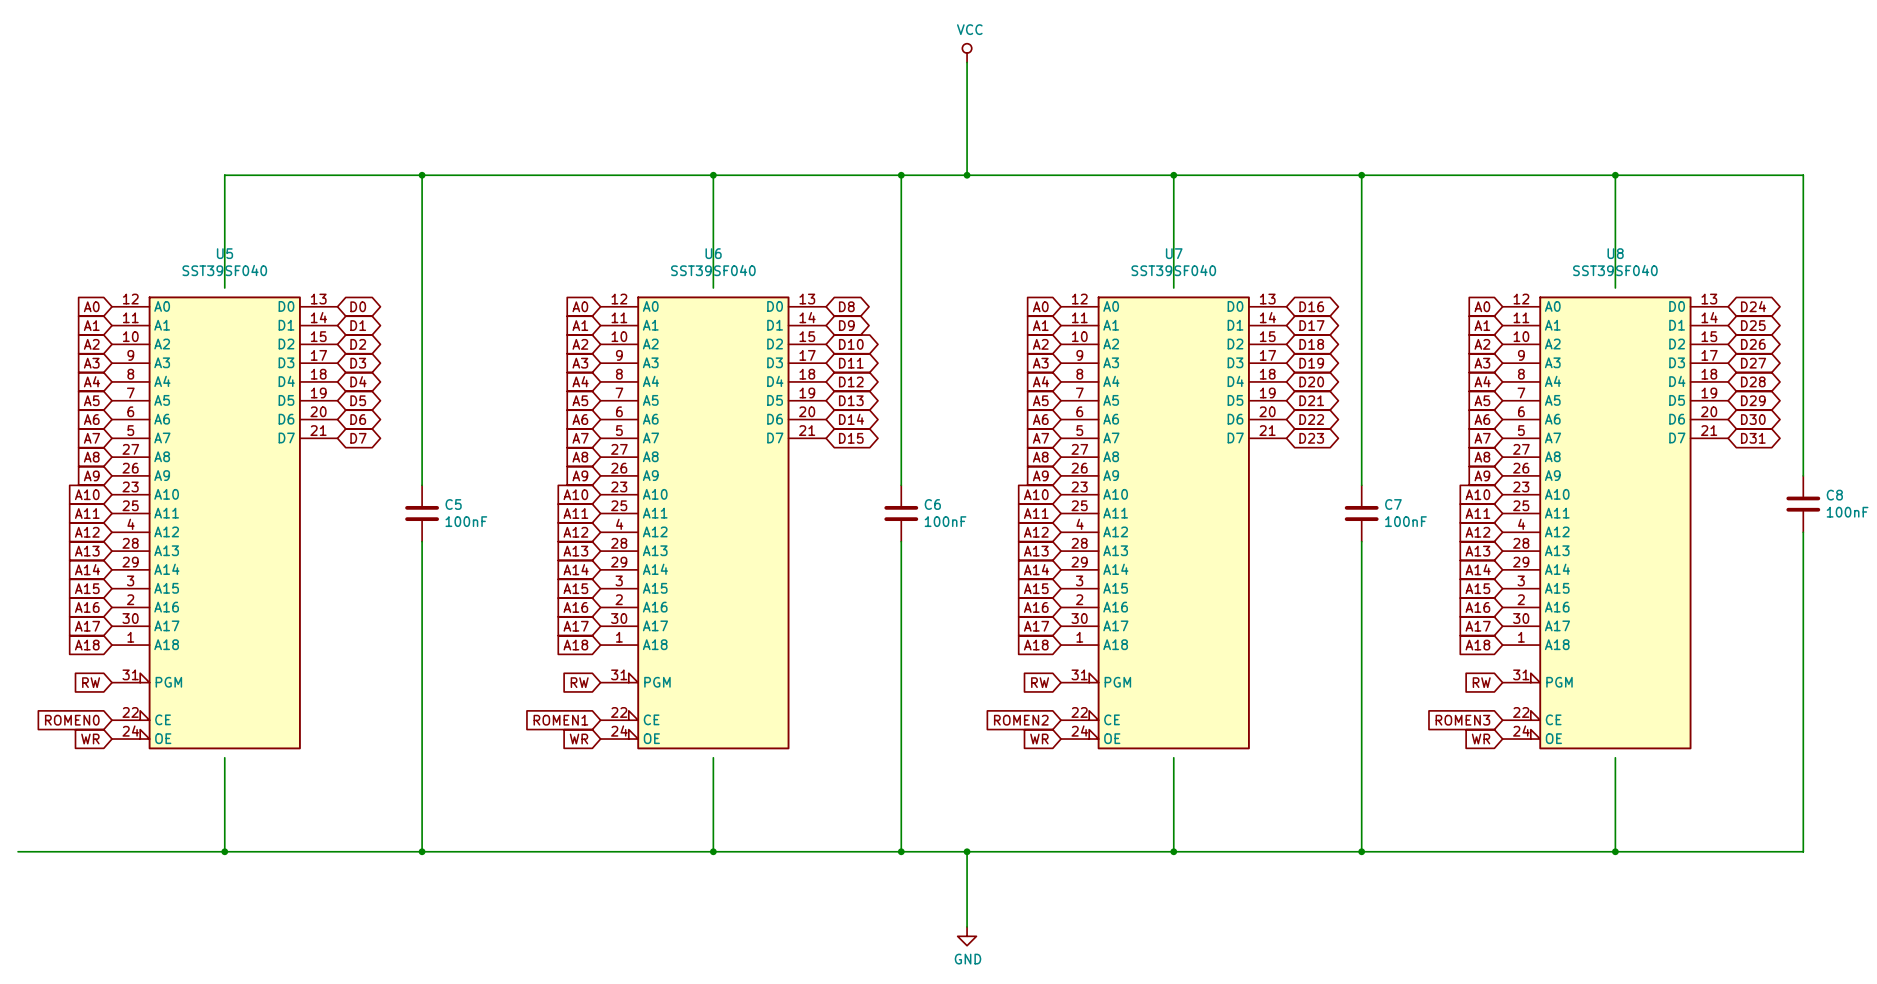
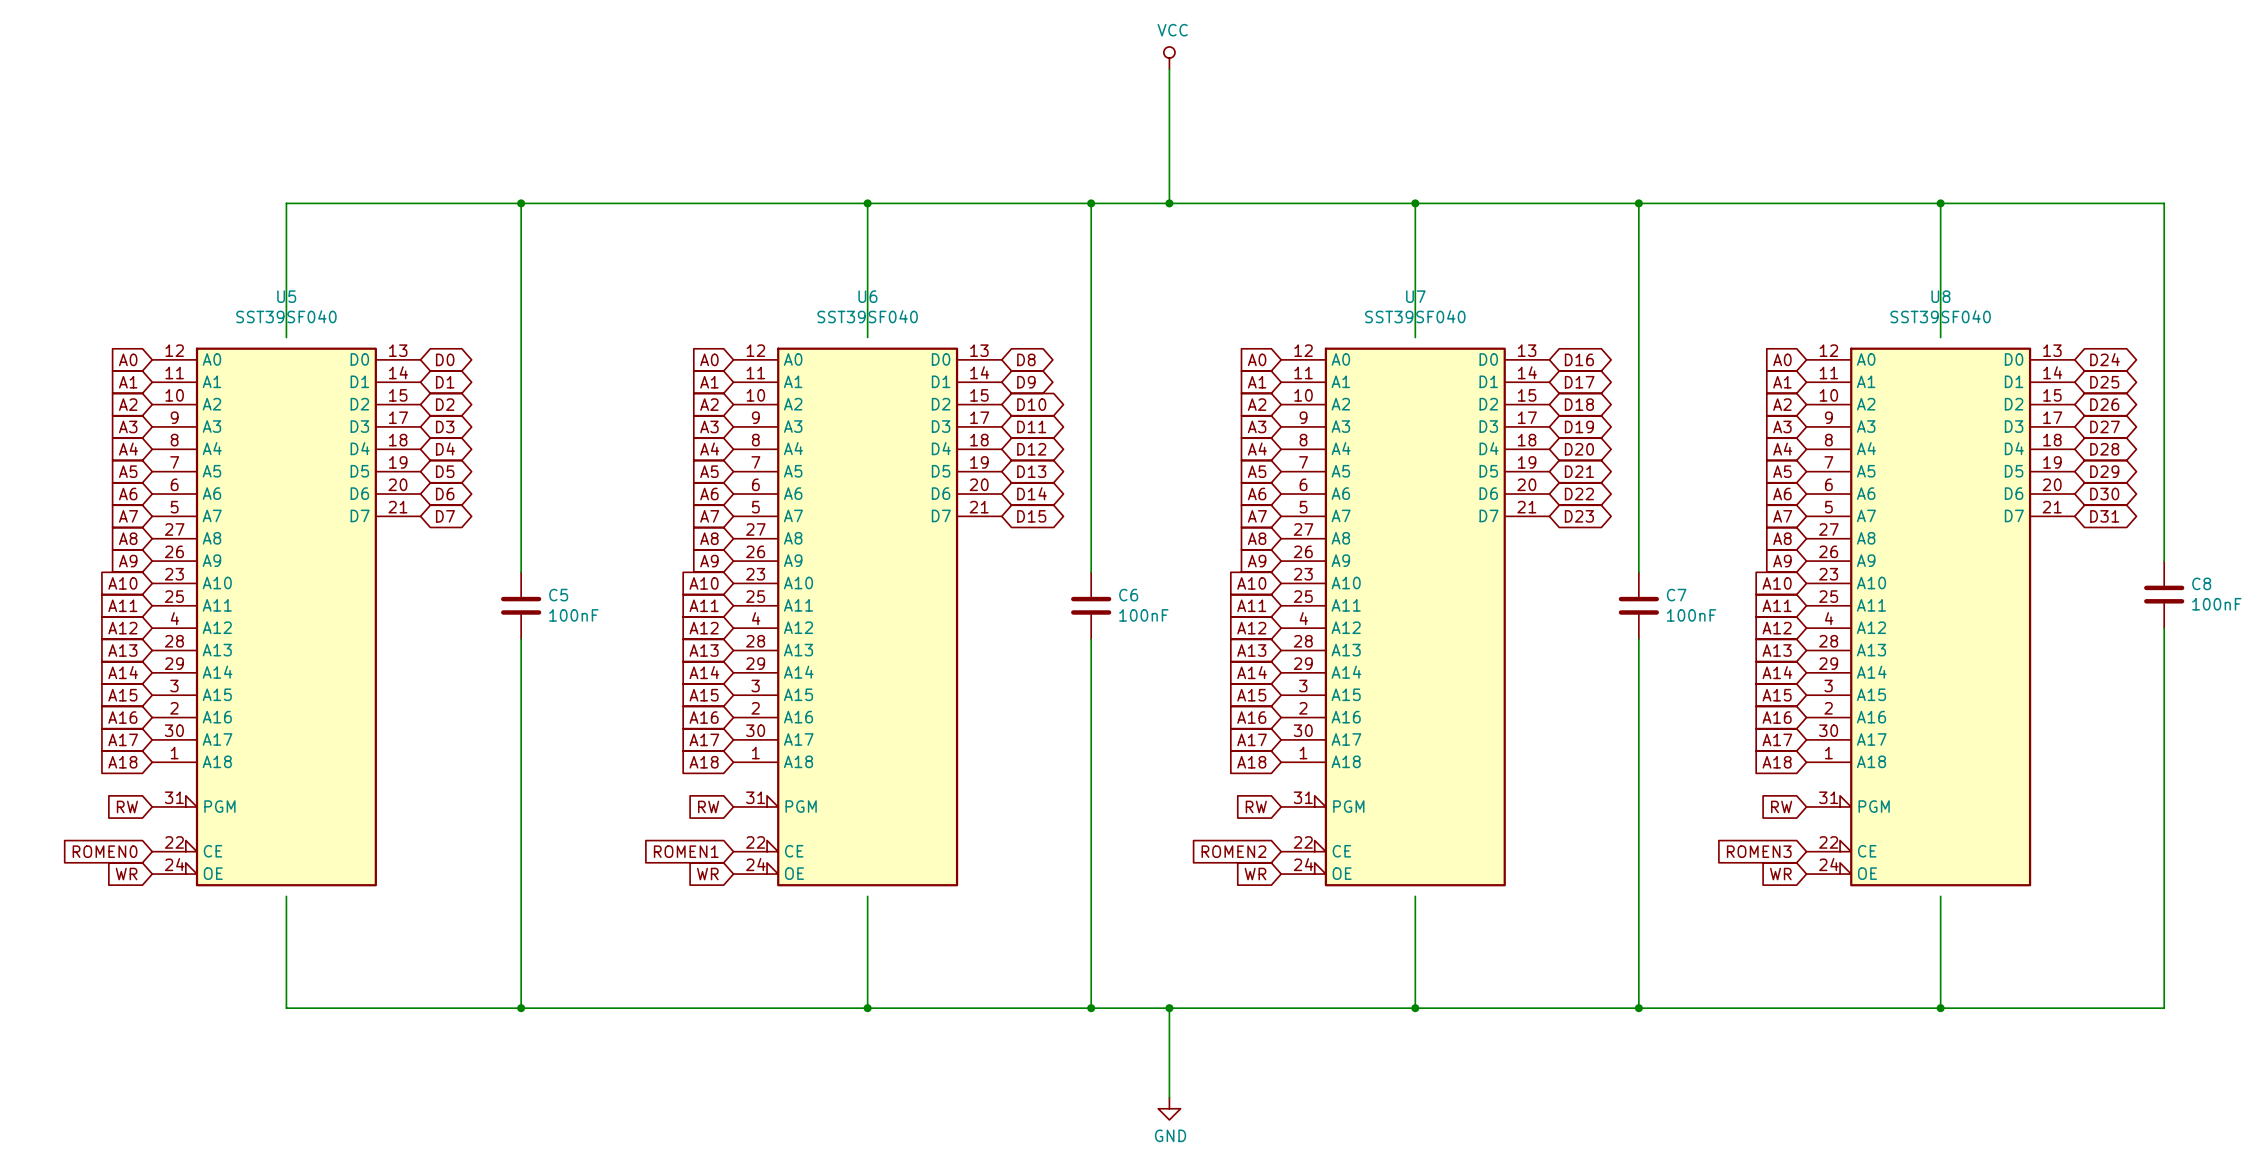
wire: (18, 851) (224, 851) -> none
junction: (224, 851) -> none

